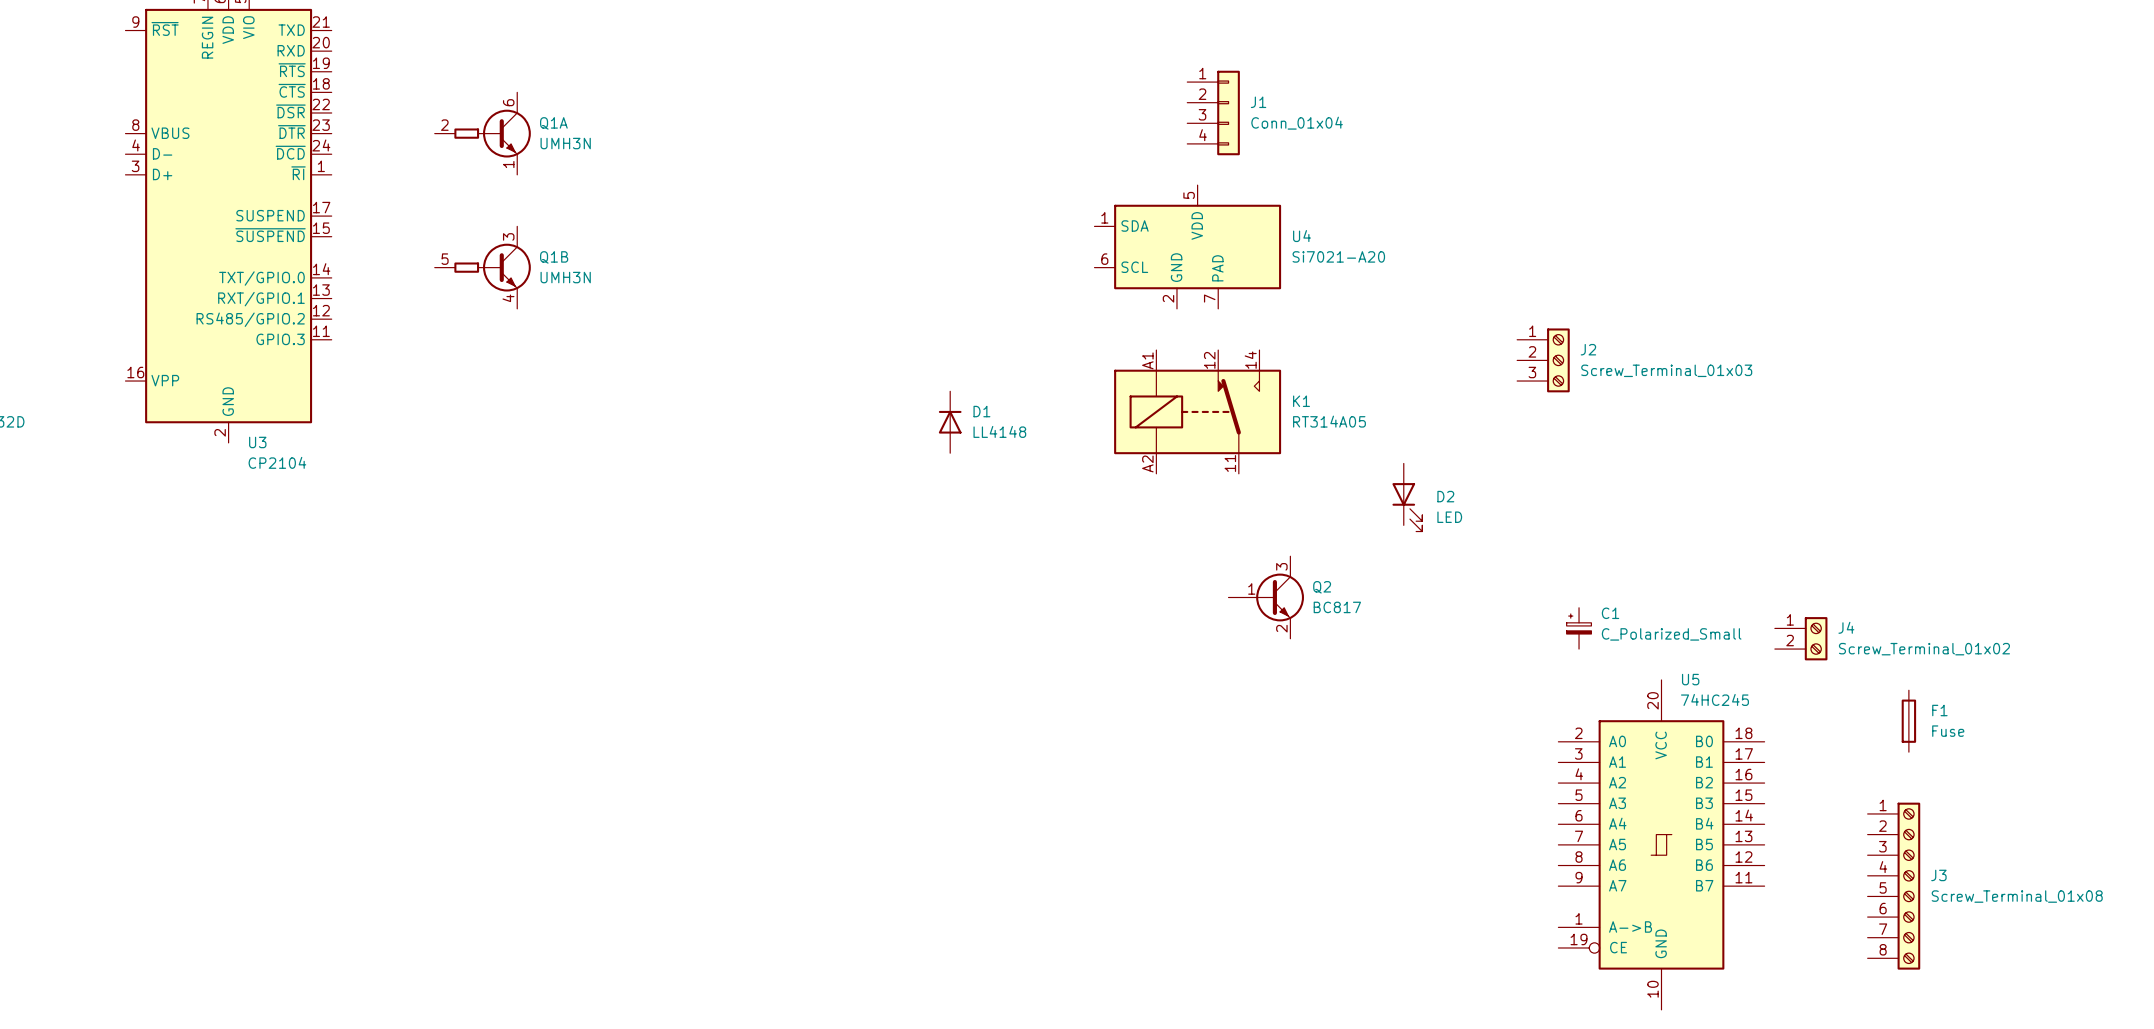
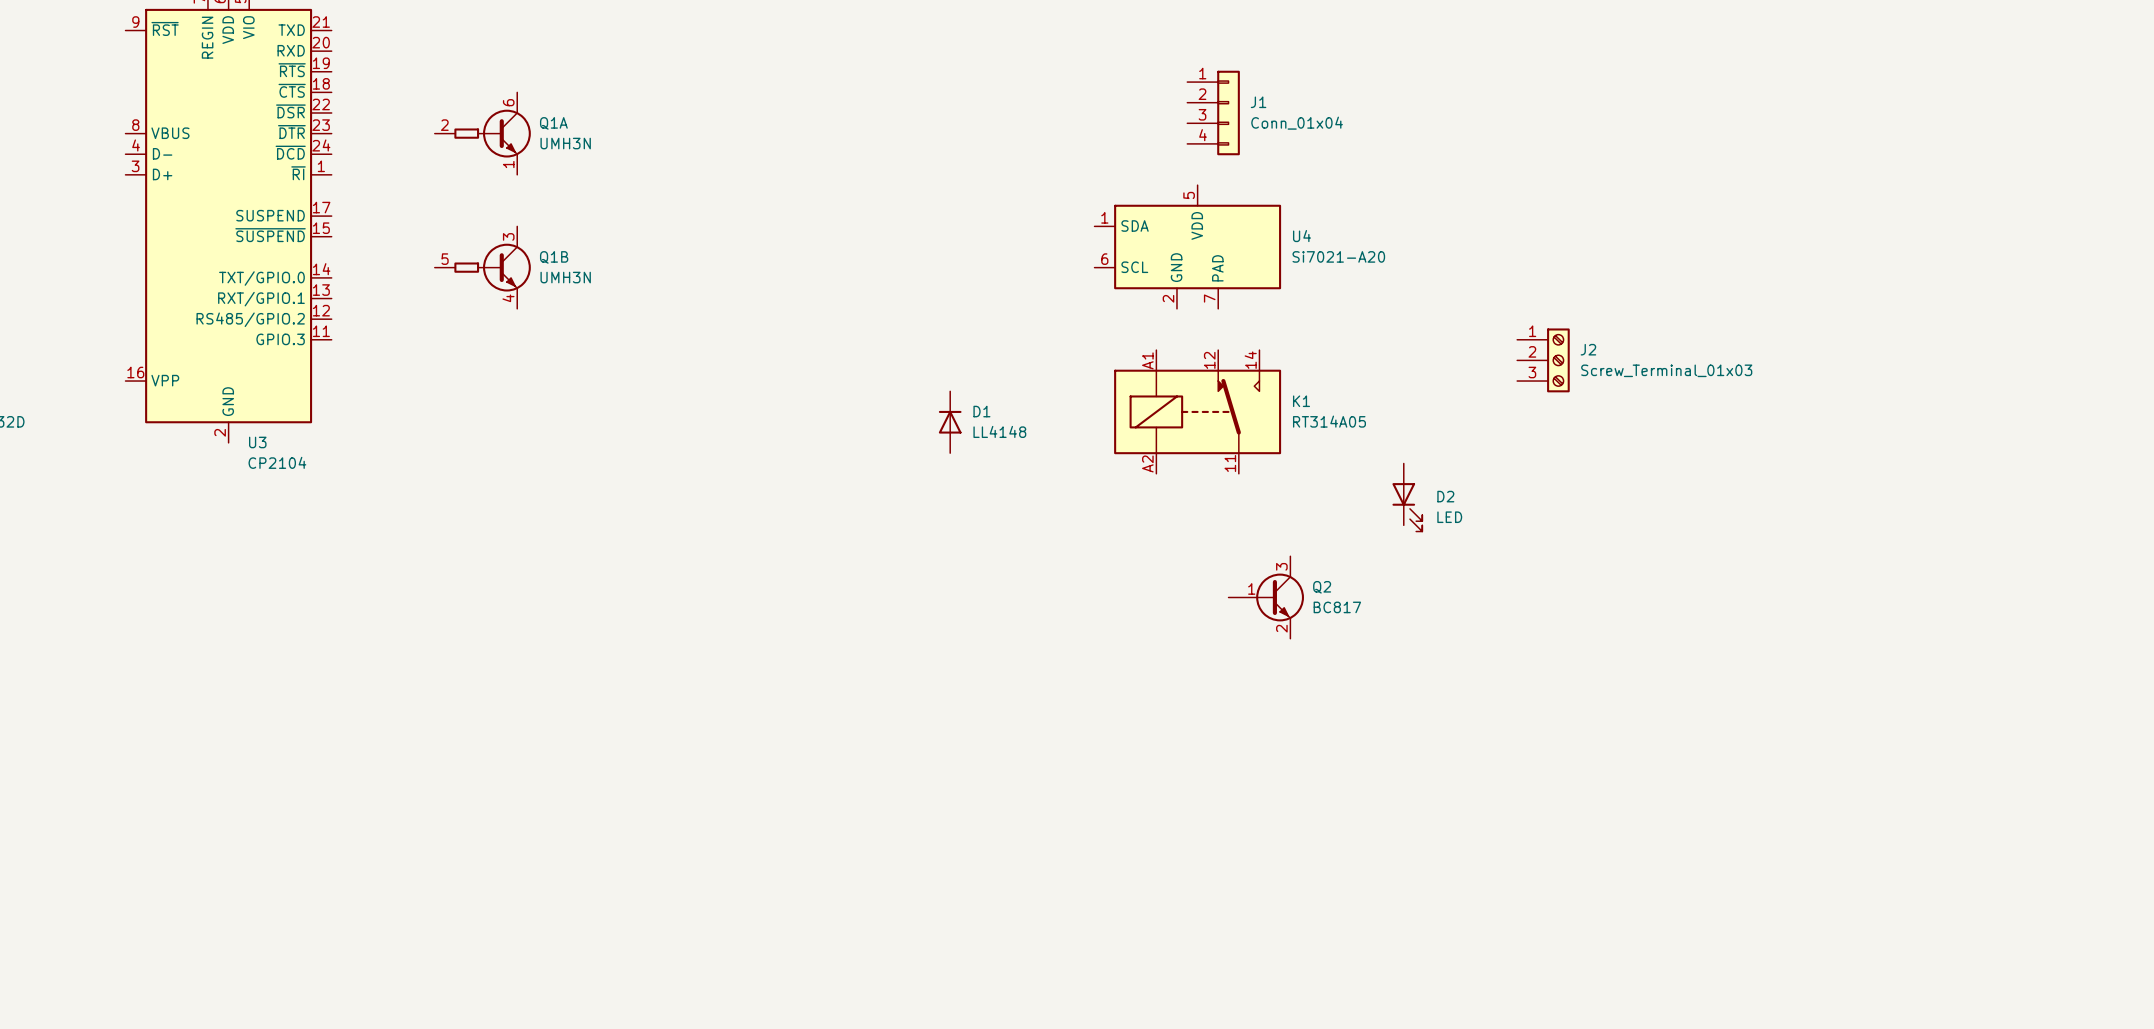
C1: C_Polarized_Small (1579, 628) -> none
J4: Screw_Terminal_01x02 (1801, 638) -> none
F1: Fuse (1908, 721) -> none
U5: 74HC245 (1661, 844) -> none
J3: Screw_Terminal_01x08 (1893, 886) -> none

